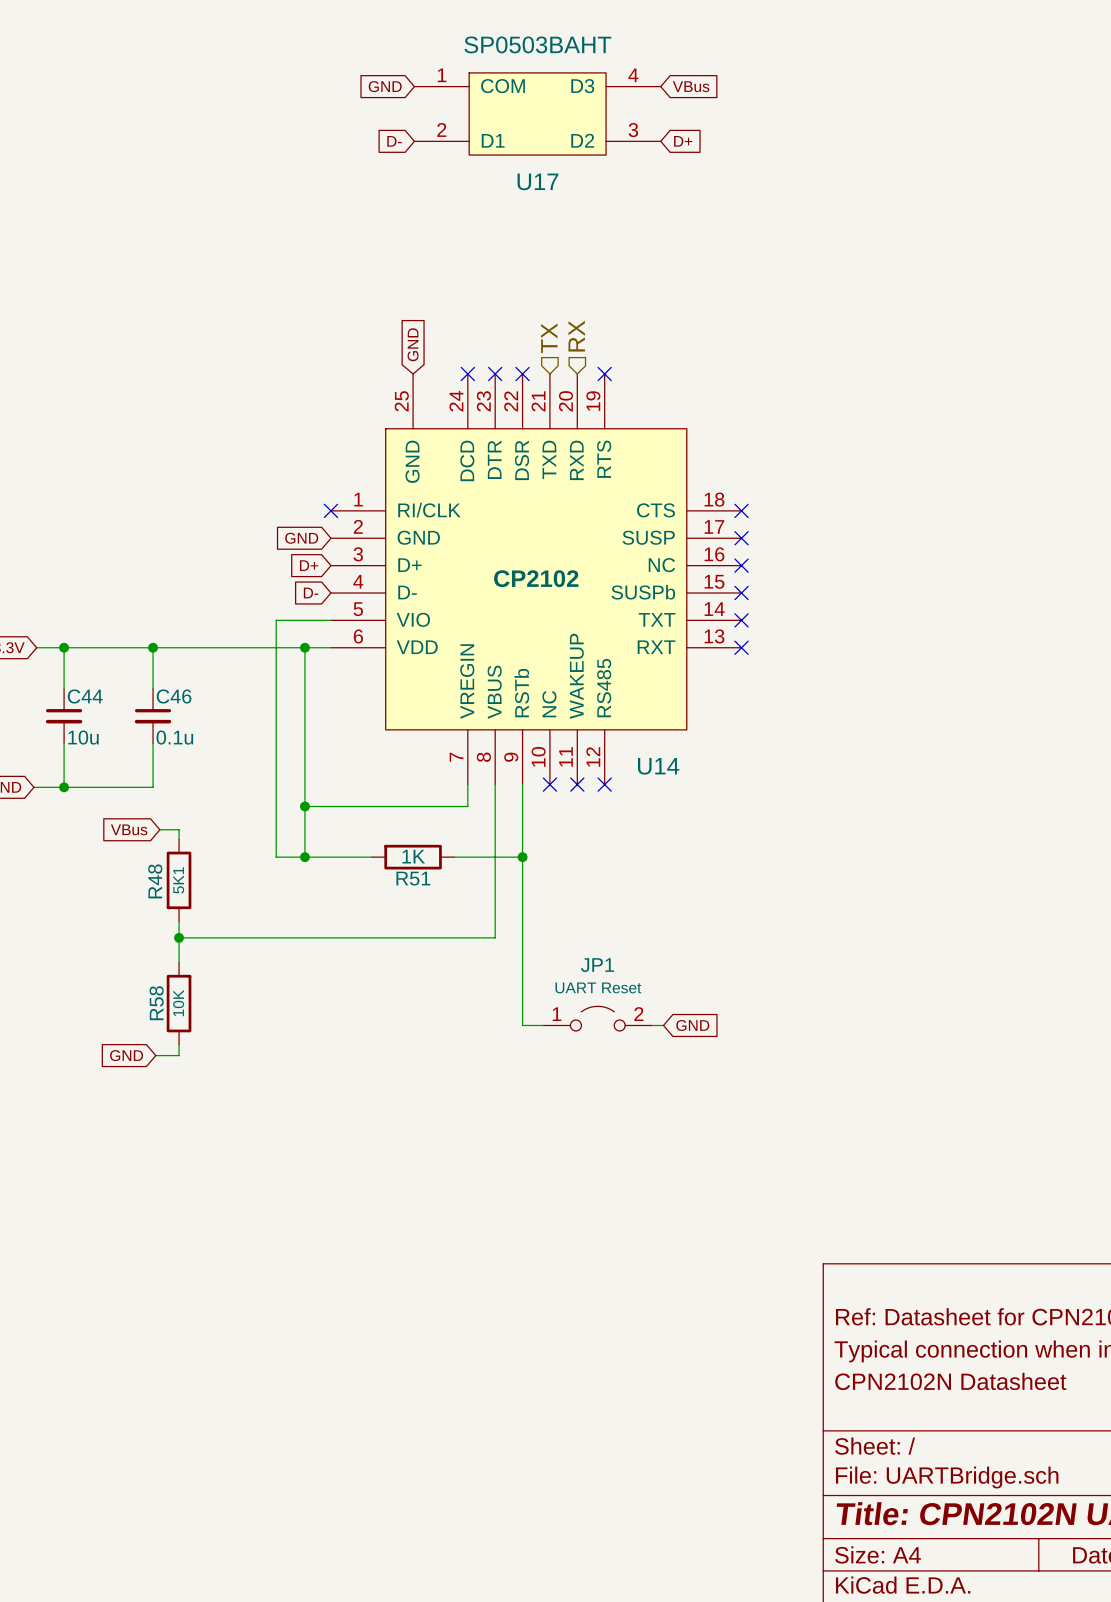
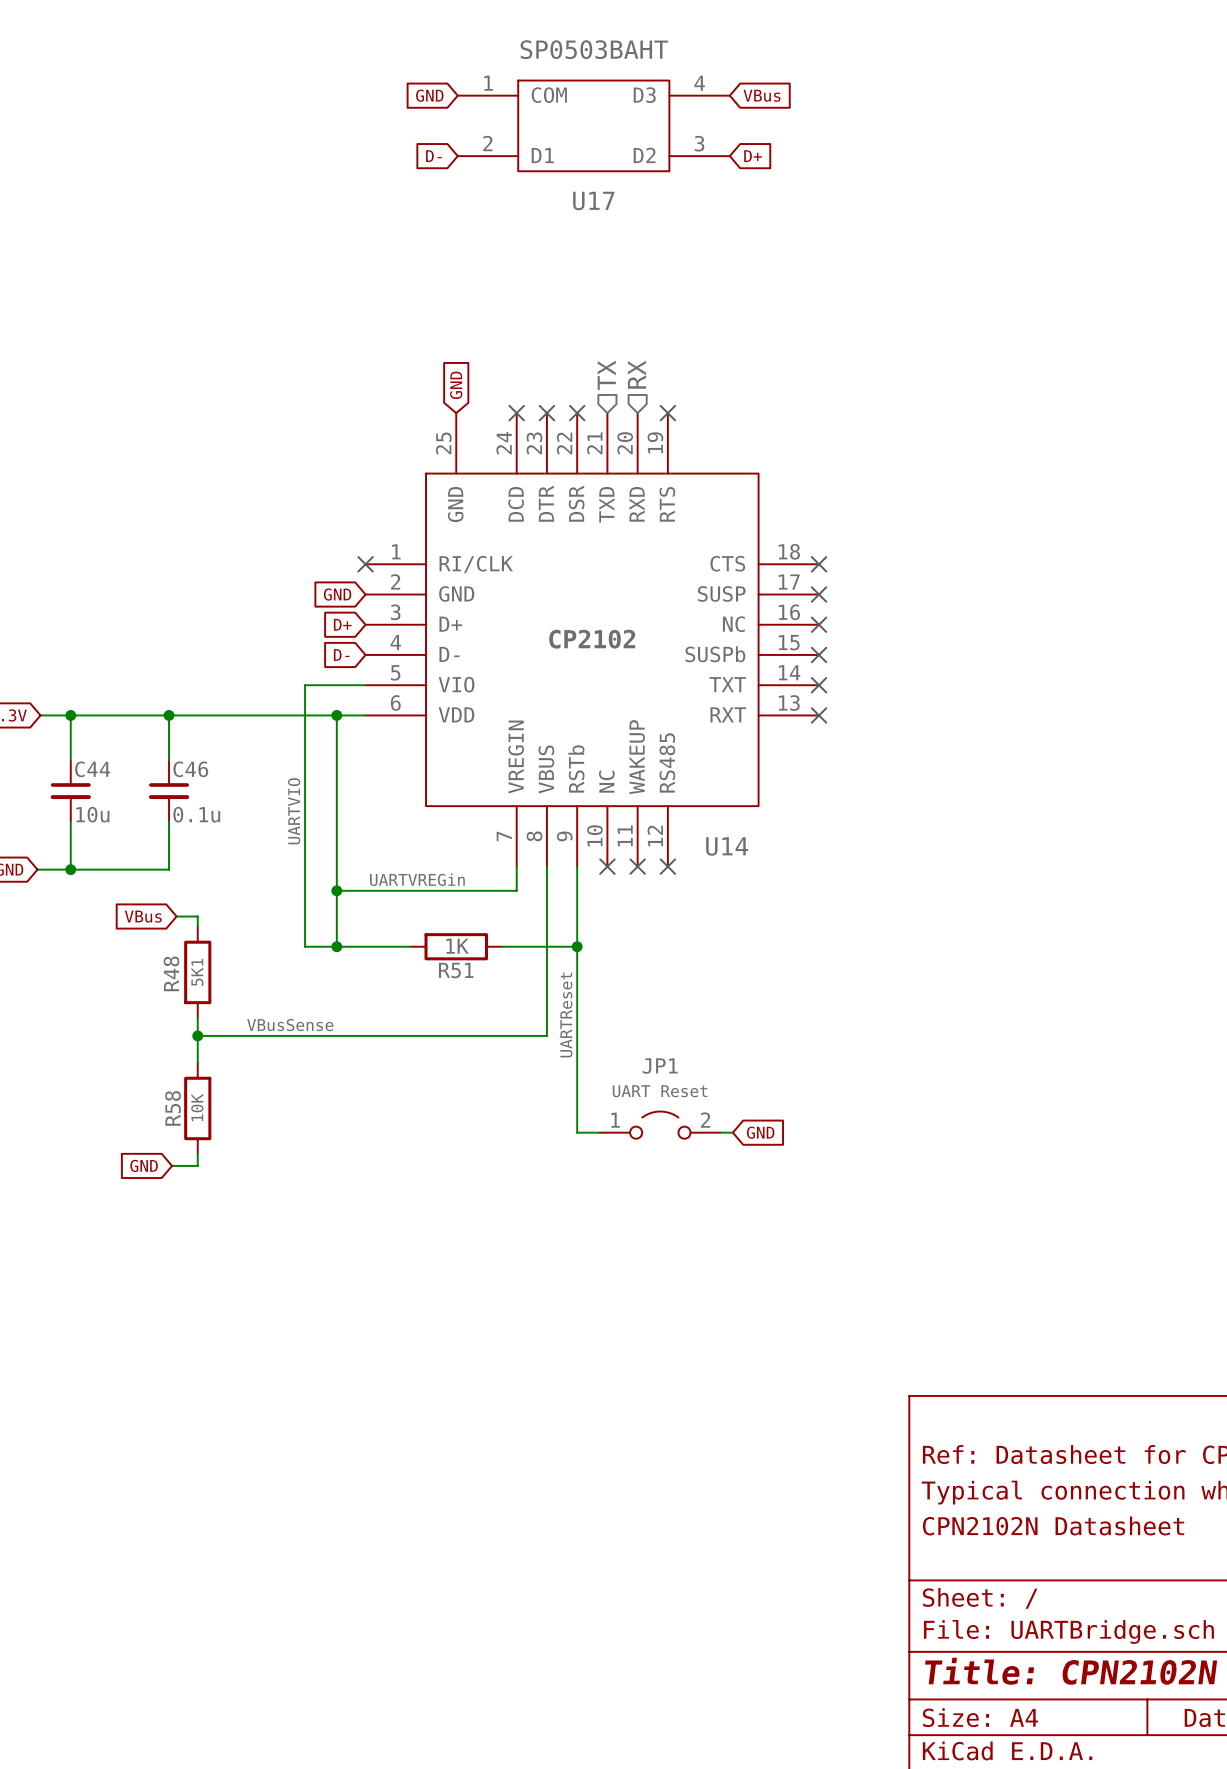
label: none -> UARTVIO (294, 811)
label: none -> UARTVREGin (417, 879)
label: none -> UARTReset (566, 1014)
label: none -> VBusSense (290, 1025)

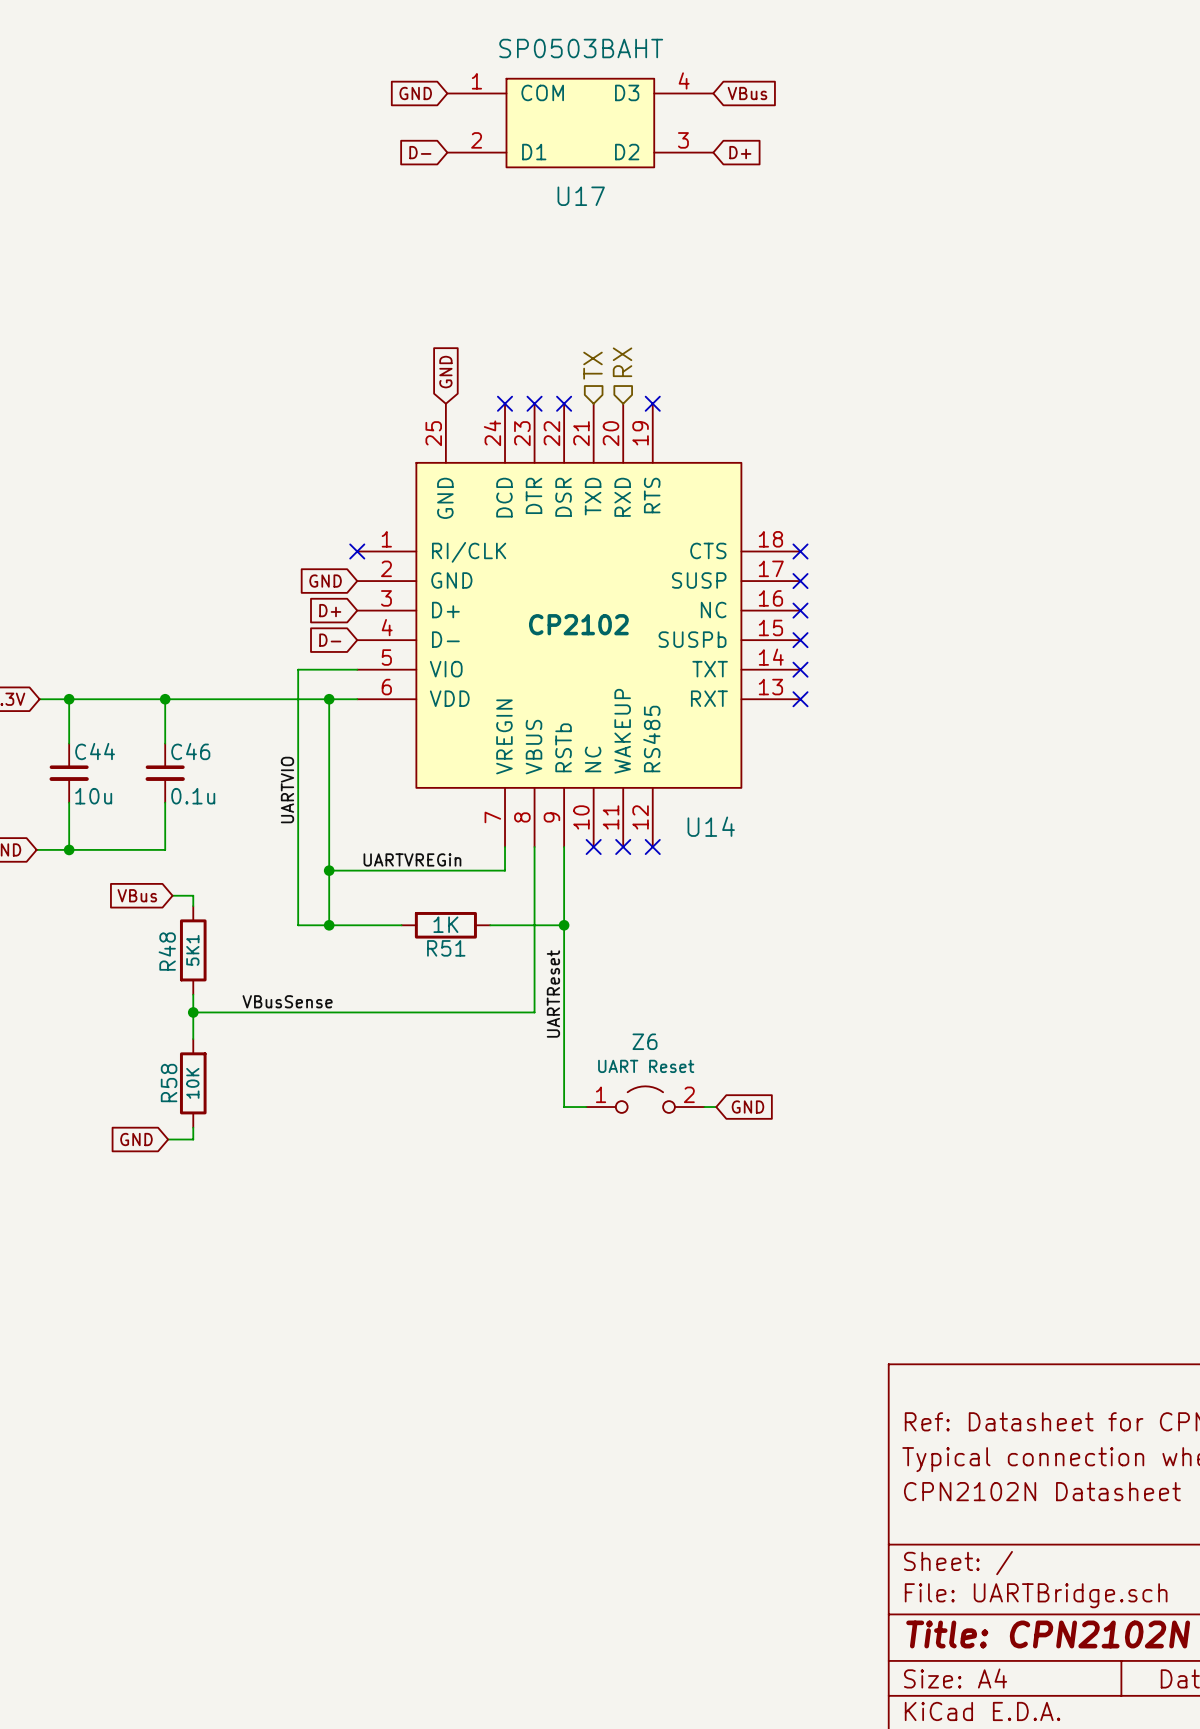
JP1 name: JP1 (660, 1066) -> Z6 (645, 1041)

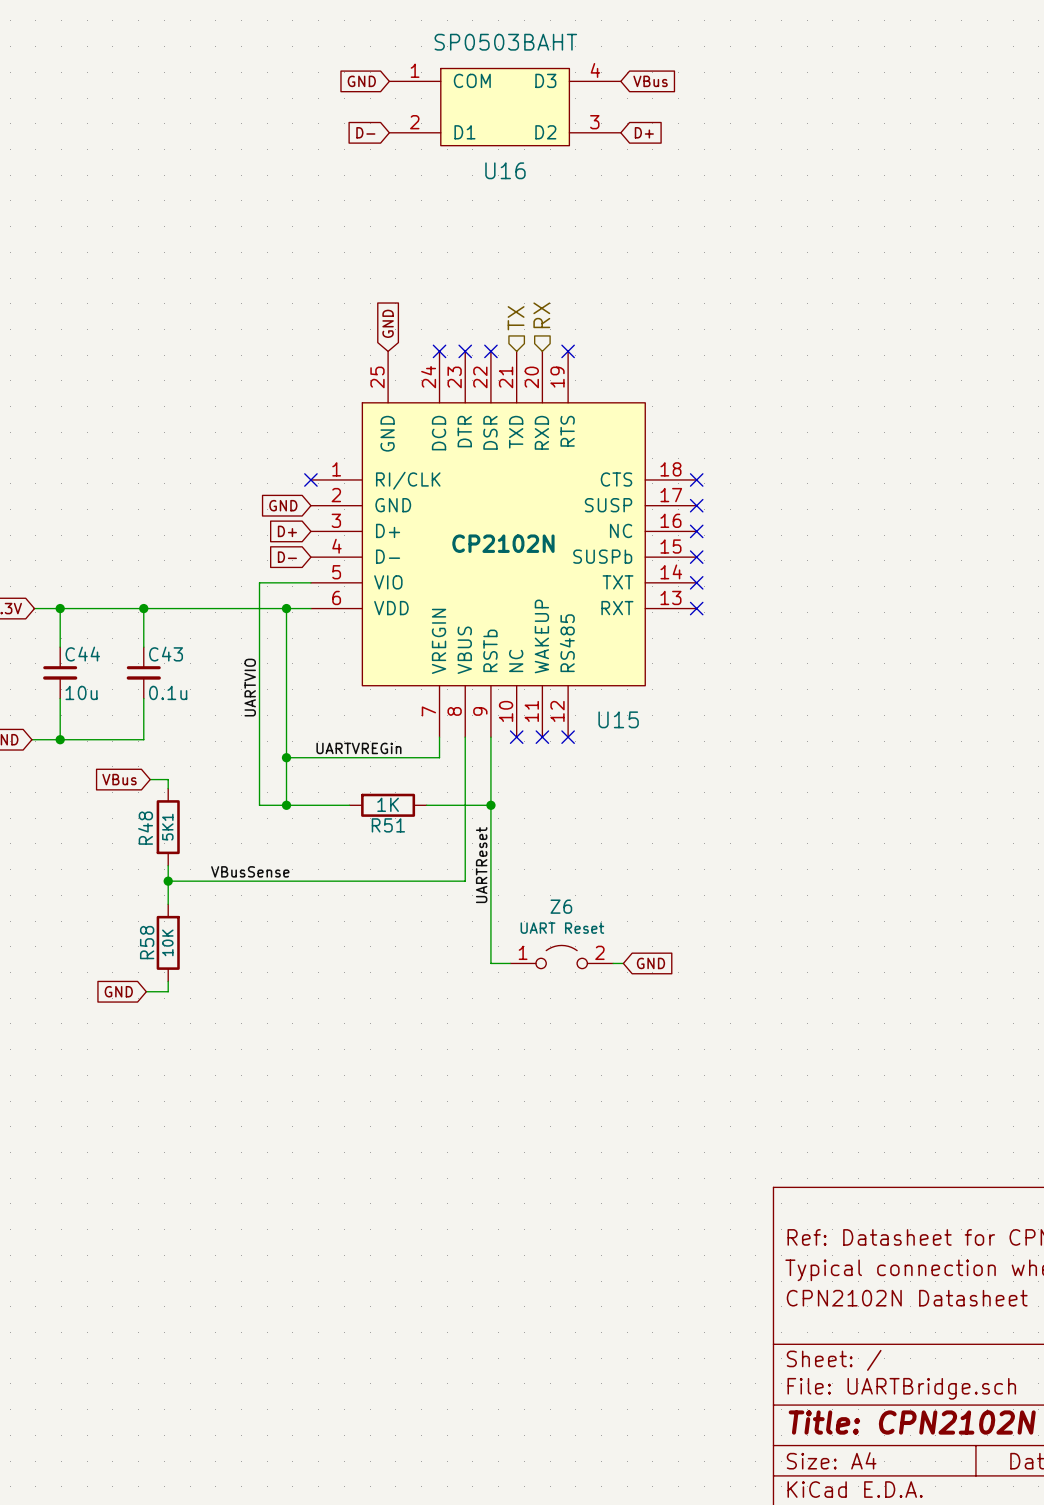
U17 name: U17 (581, 196) -> U16 (505, 170)
U14 value: CP2102 (578, 624) -> CP2102N (503, 543)
C46 name: C46 (190, 751) -> C43 (166, 654)
U14 name: U14 (711, 826) -> U15 (618, 719)

